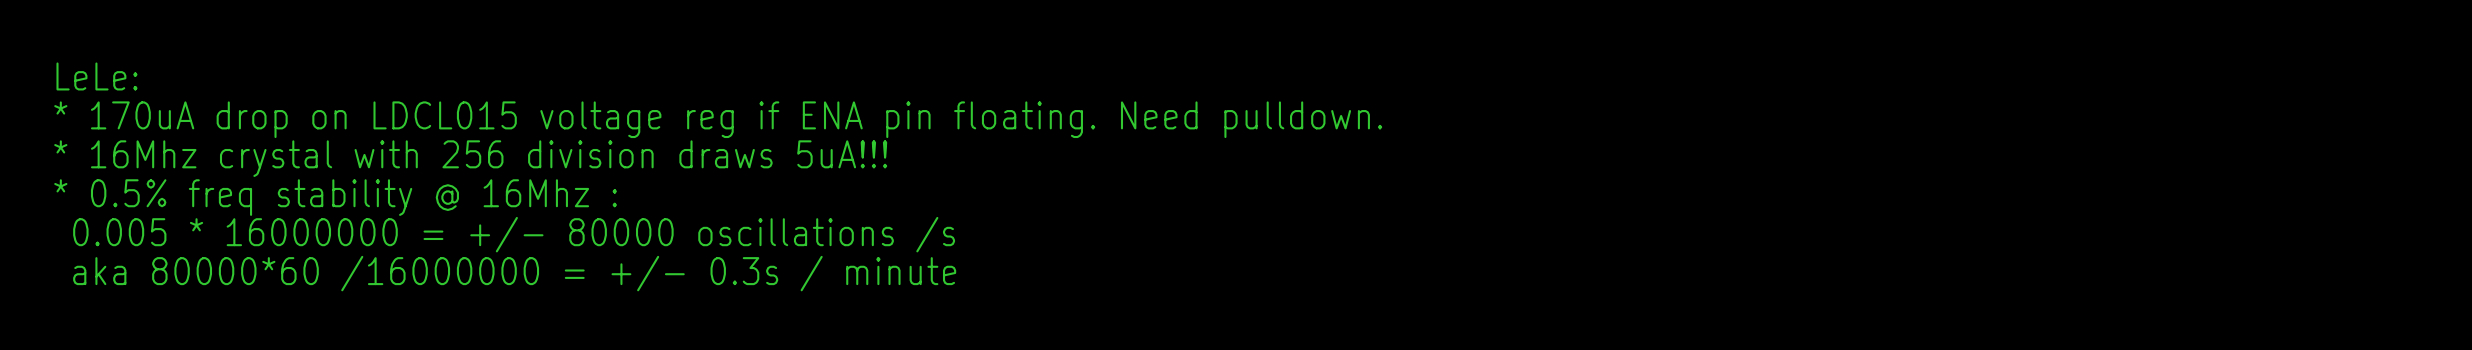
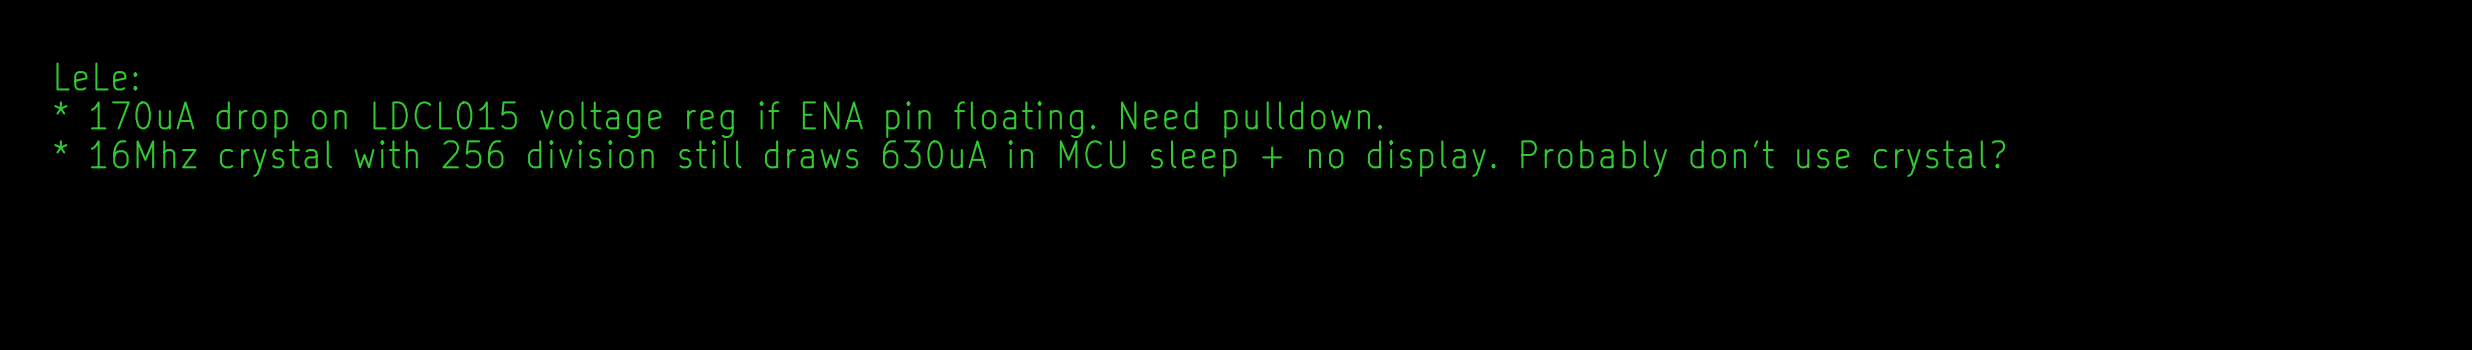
text: * 16Mhz crystal with 256 division draws 5uA!!! (470, 158) -> * 16Mhz crystal with 256 division still draws 630uA in MCU sleep + no display. Probably don't use crystal? (1029, 158)
text: * 0.5% freq stability @ 16Mhz : (335, 197) -> none
text: 0.005 * 16000000 = +/- 80000 oscillations /s (514, 234) -> none
text: aka 80000*60 /16000000 = +/- 0.3s / minute (514, 273) -> none

